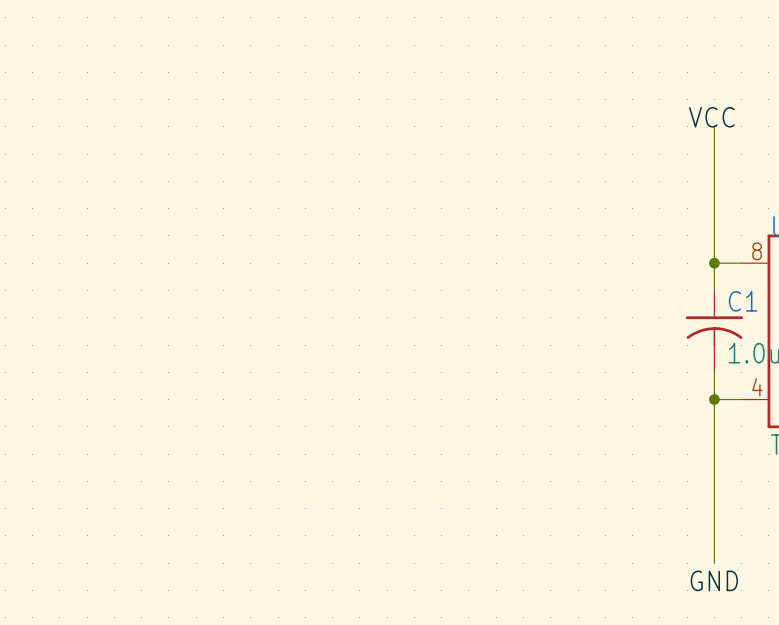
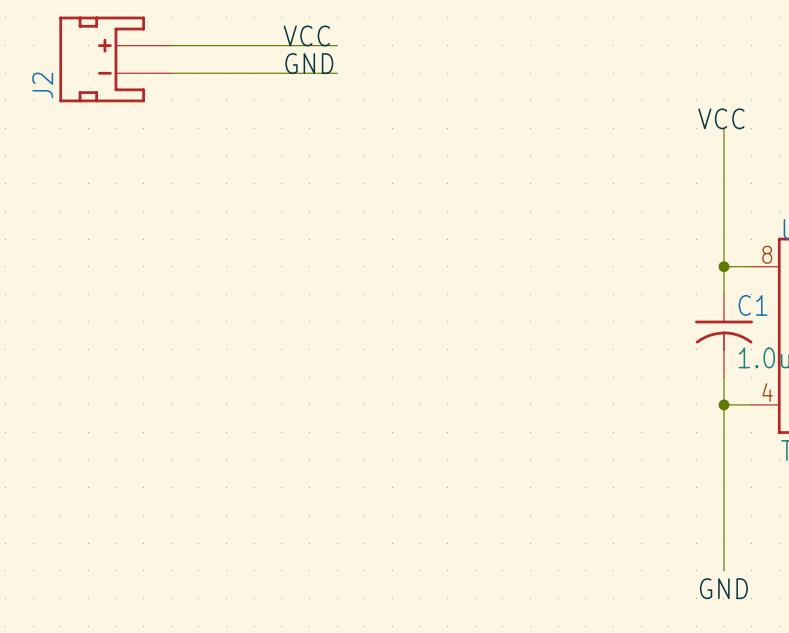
label: none -> VCC (306, 35)
wire: none -> (171, 45) (337, 45)
J2: none -> (115, 59)
label: none -> GND (309, 63)
wire: none -> (171, 73) (337, 73)

